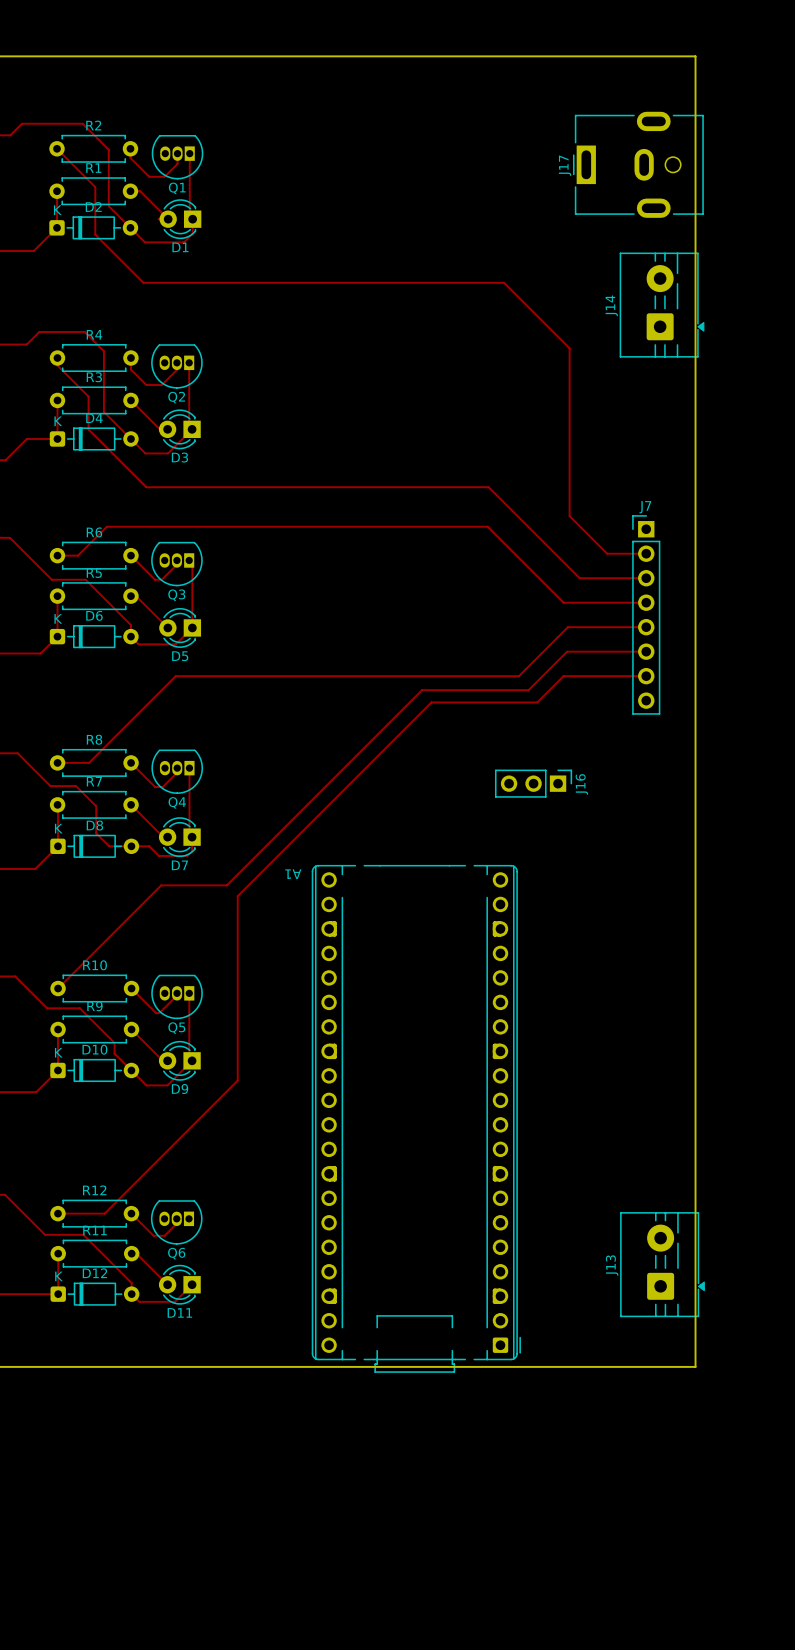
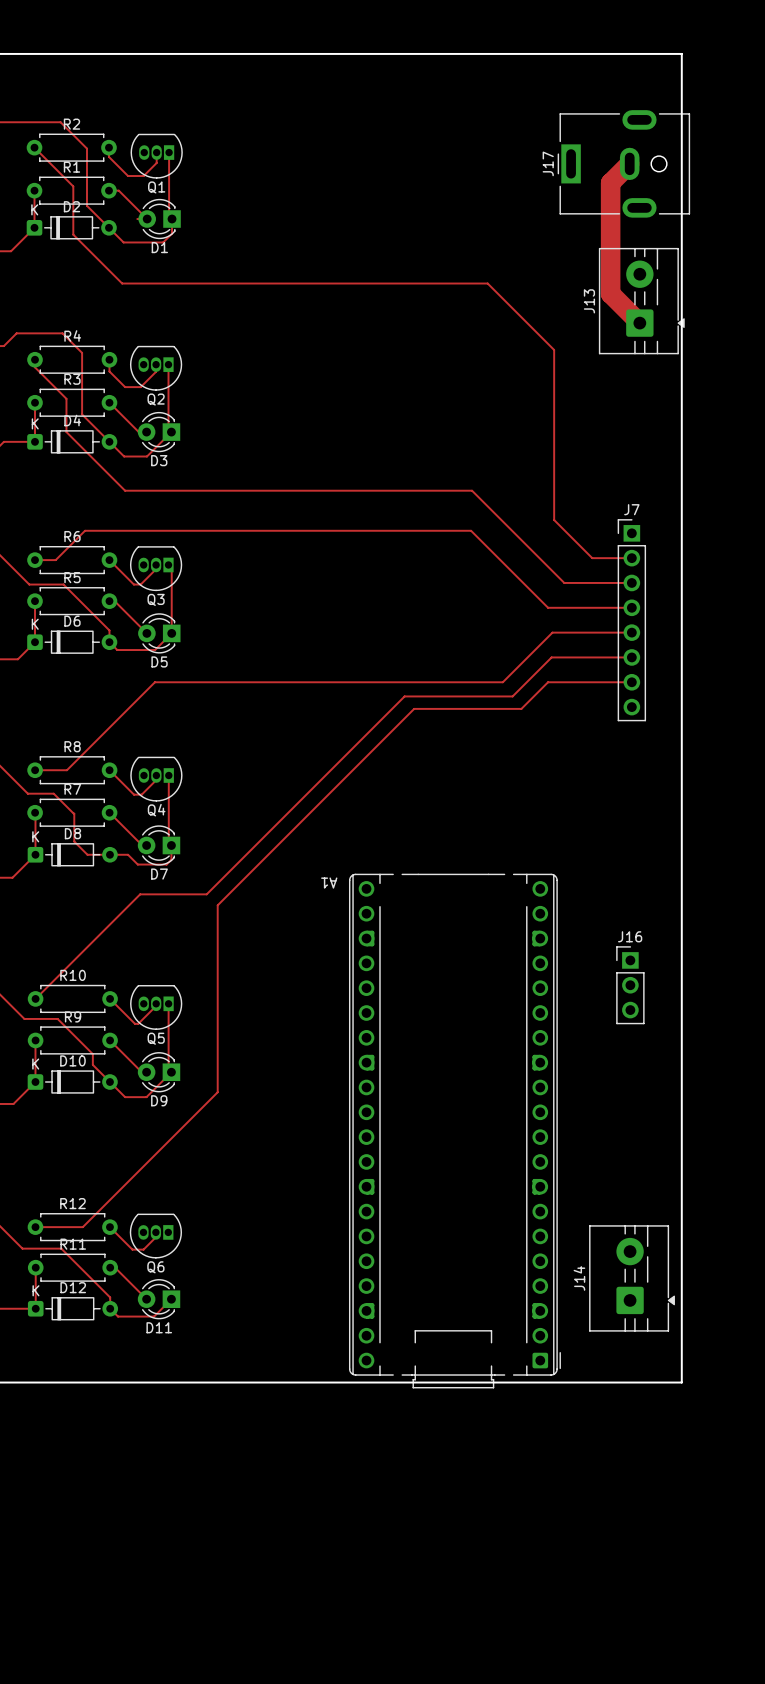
track: none -> (629, 163) (610, 182) (610, 293) (639, 323)
J14 position: (662, 305) -> (632, 1278)
J16 rotation: 0° (533, 783) -> 90° counterclockwise (630, 985)
J16 position: (533, 783) -> (630, 985)
A1 position: (416, 1118) -> (454, 1131)
J13 position: (662, 1264) -> (641, 301)

